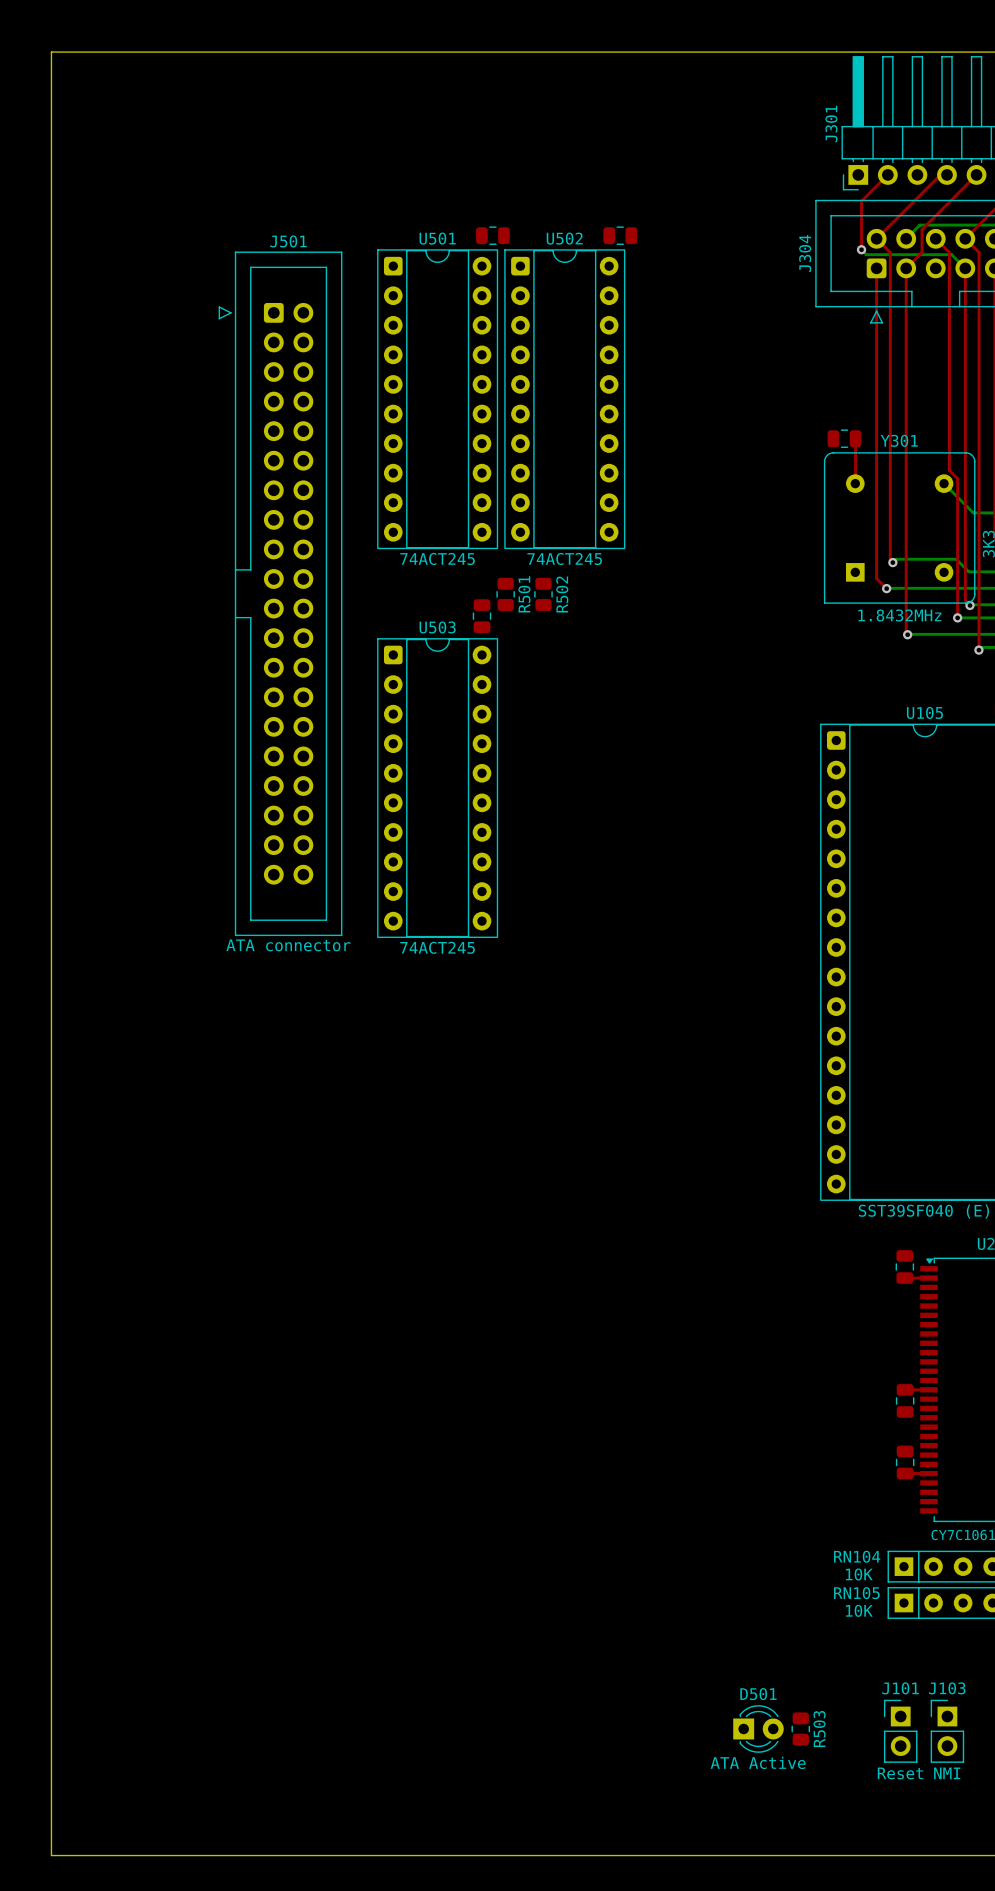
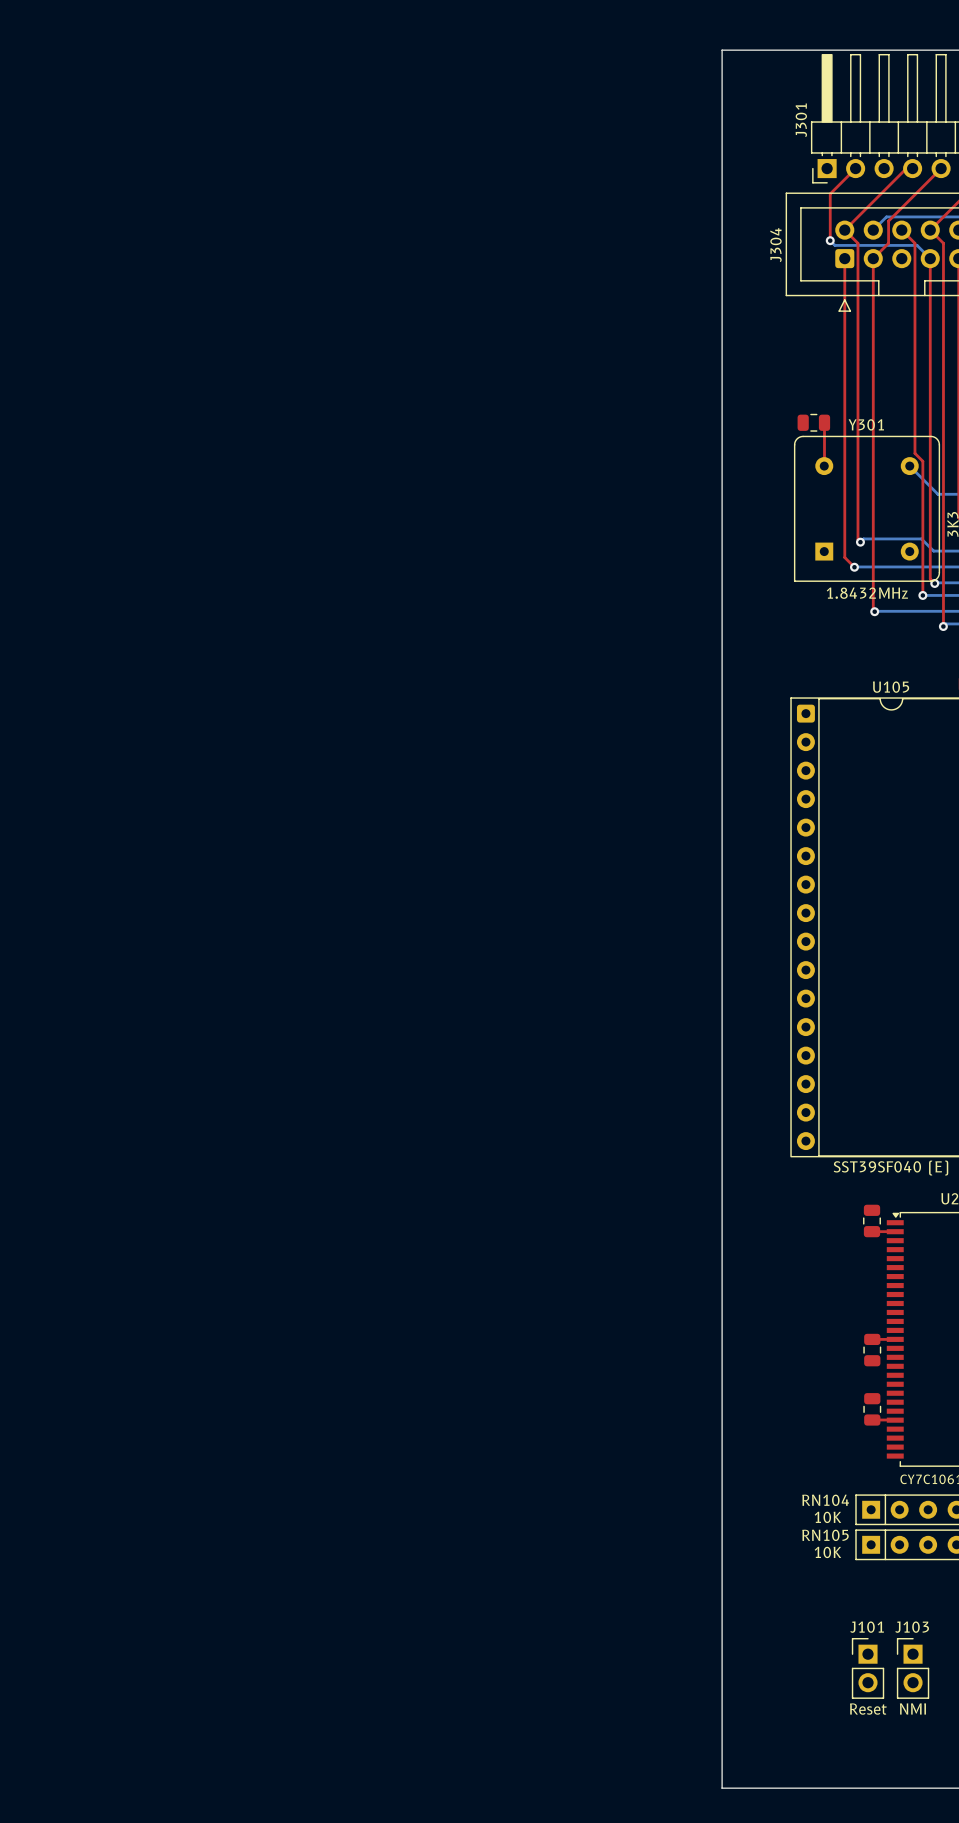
board edge: (749, 52) (51, 52) (51, 1855) (749, 1855) -> (722, 50) (722, 1788)
part: (492, 235) -> none
part: (620, 235) -> none
U501: 74ACT245 (437, 399) -> none
U502: 74ACT245 (564, 399) -> none
J501: ATA connector (280, 593) -> none
R501: (505, 594) -> none
R502: (543, 594) -> none
part: (481, 616) -> none
U503: 74ACT245 (437, 788) -> none
D501: ATA Active (758, 1728) -> none
R503: (800, 1728) -> none

